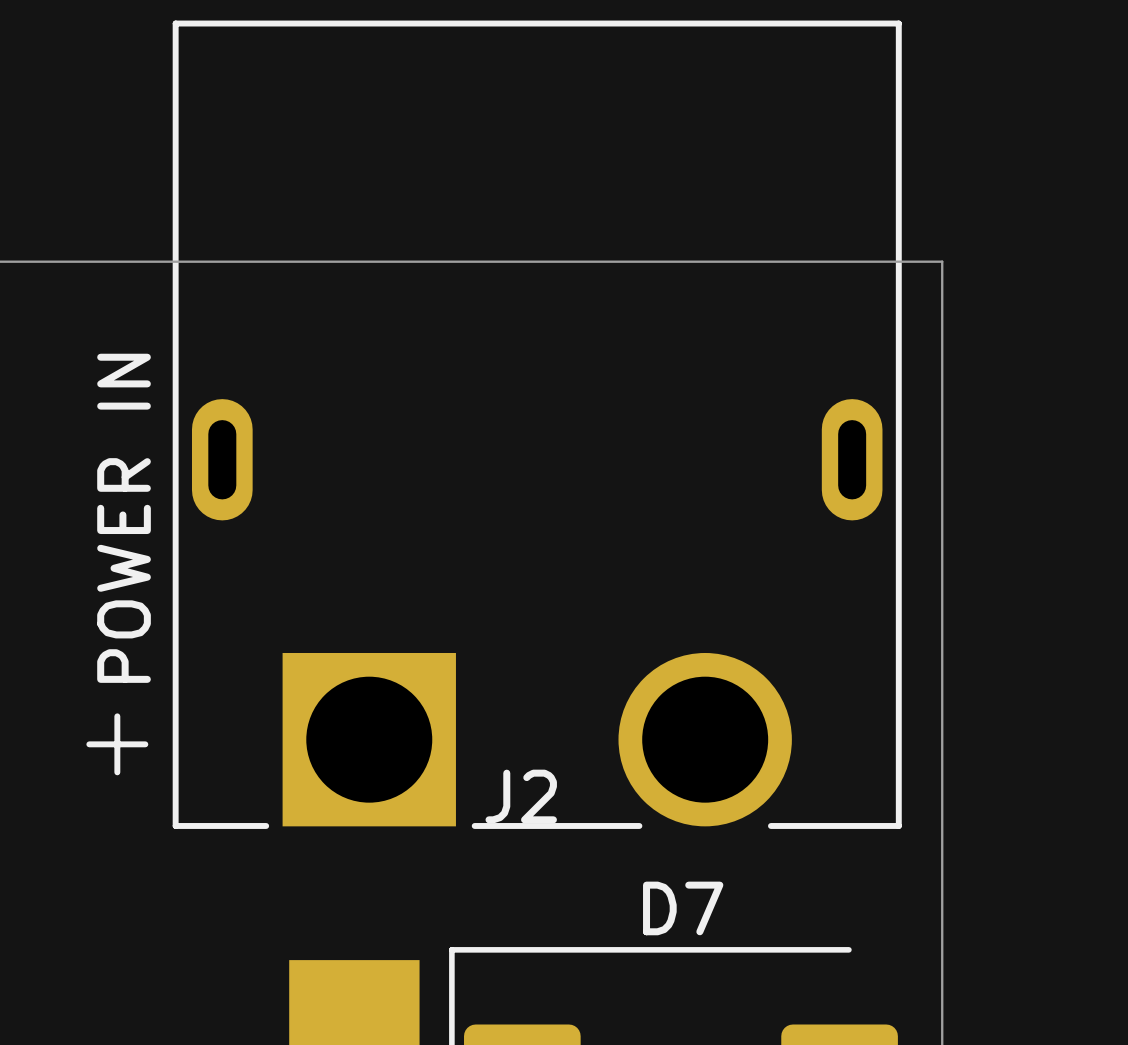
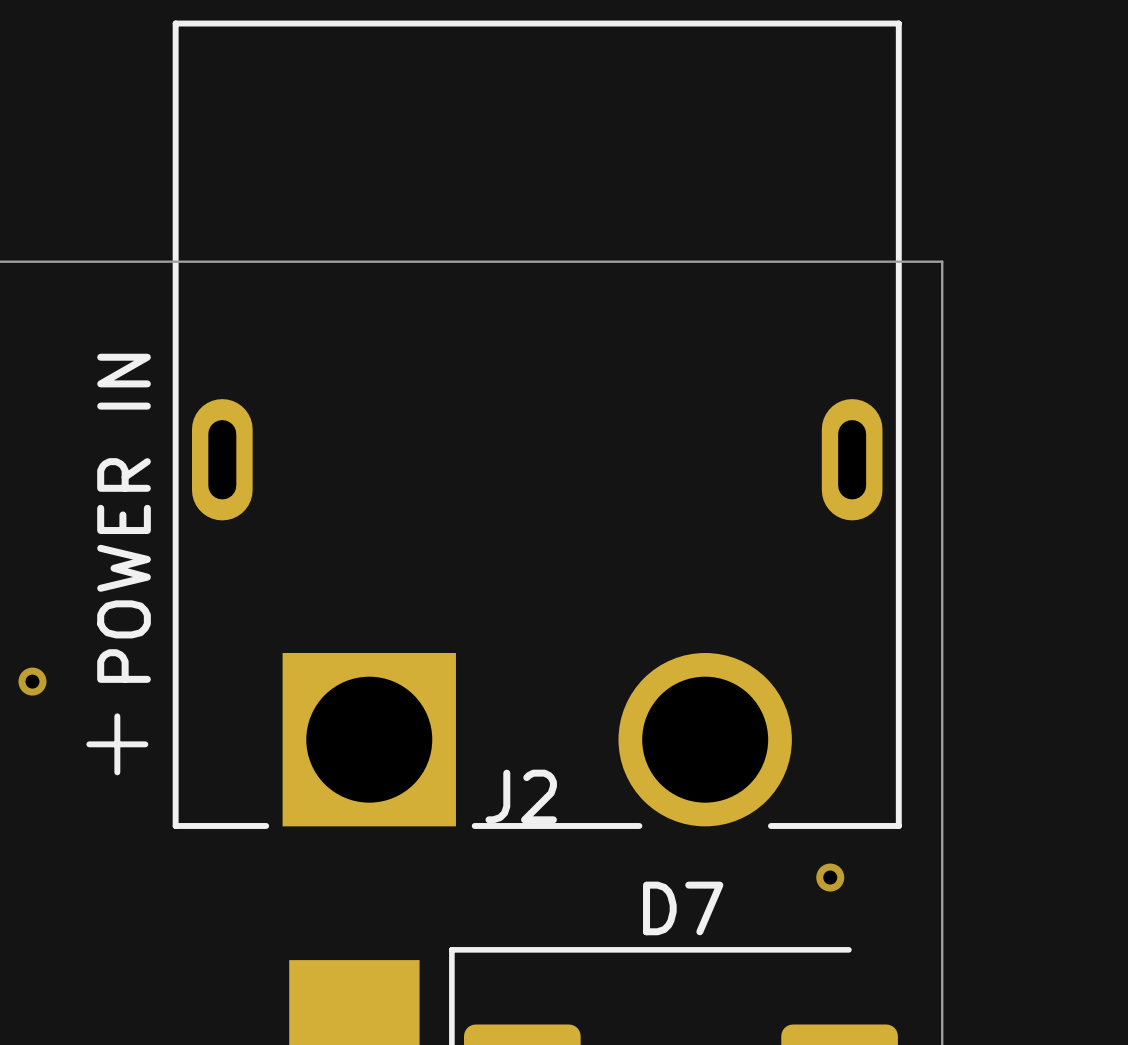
via: none -> (32, 681)
via: none -> (830, 877)

